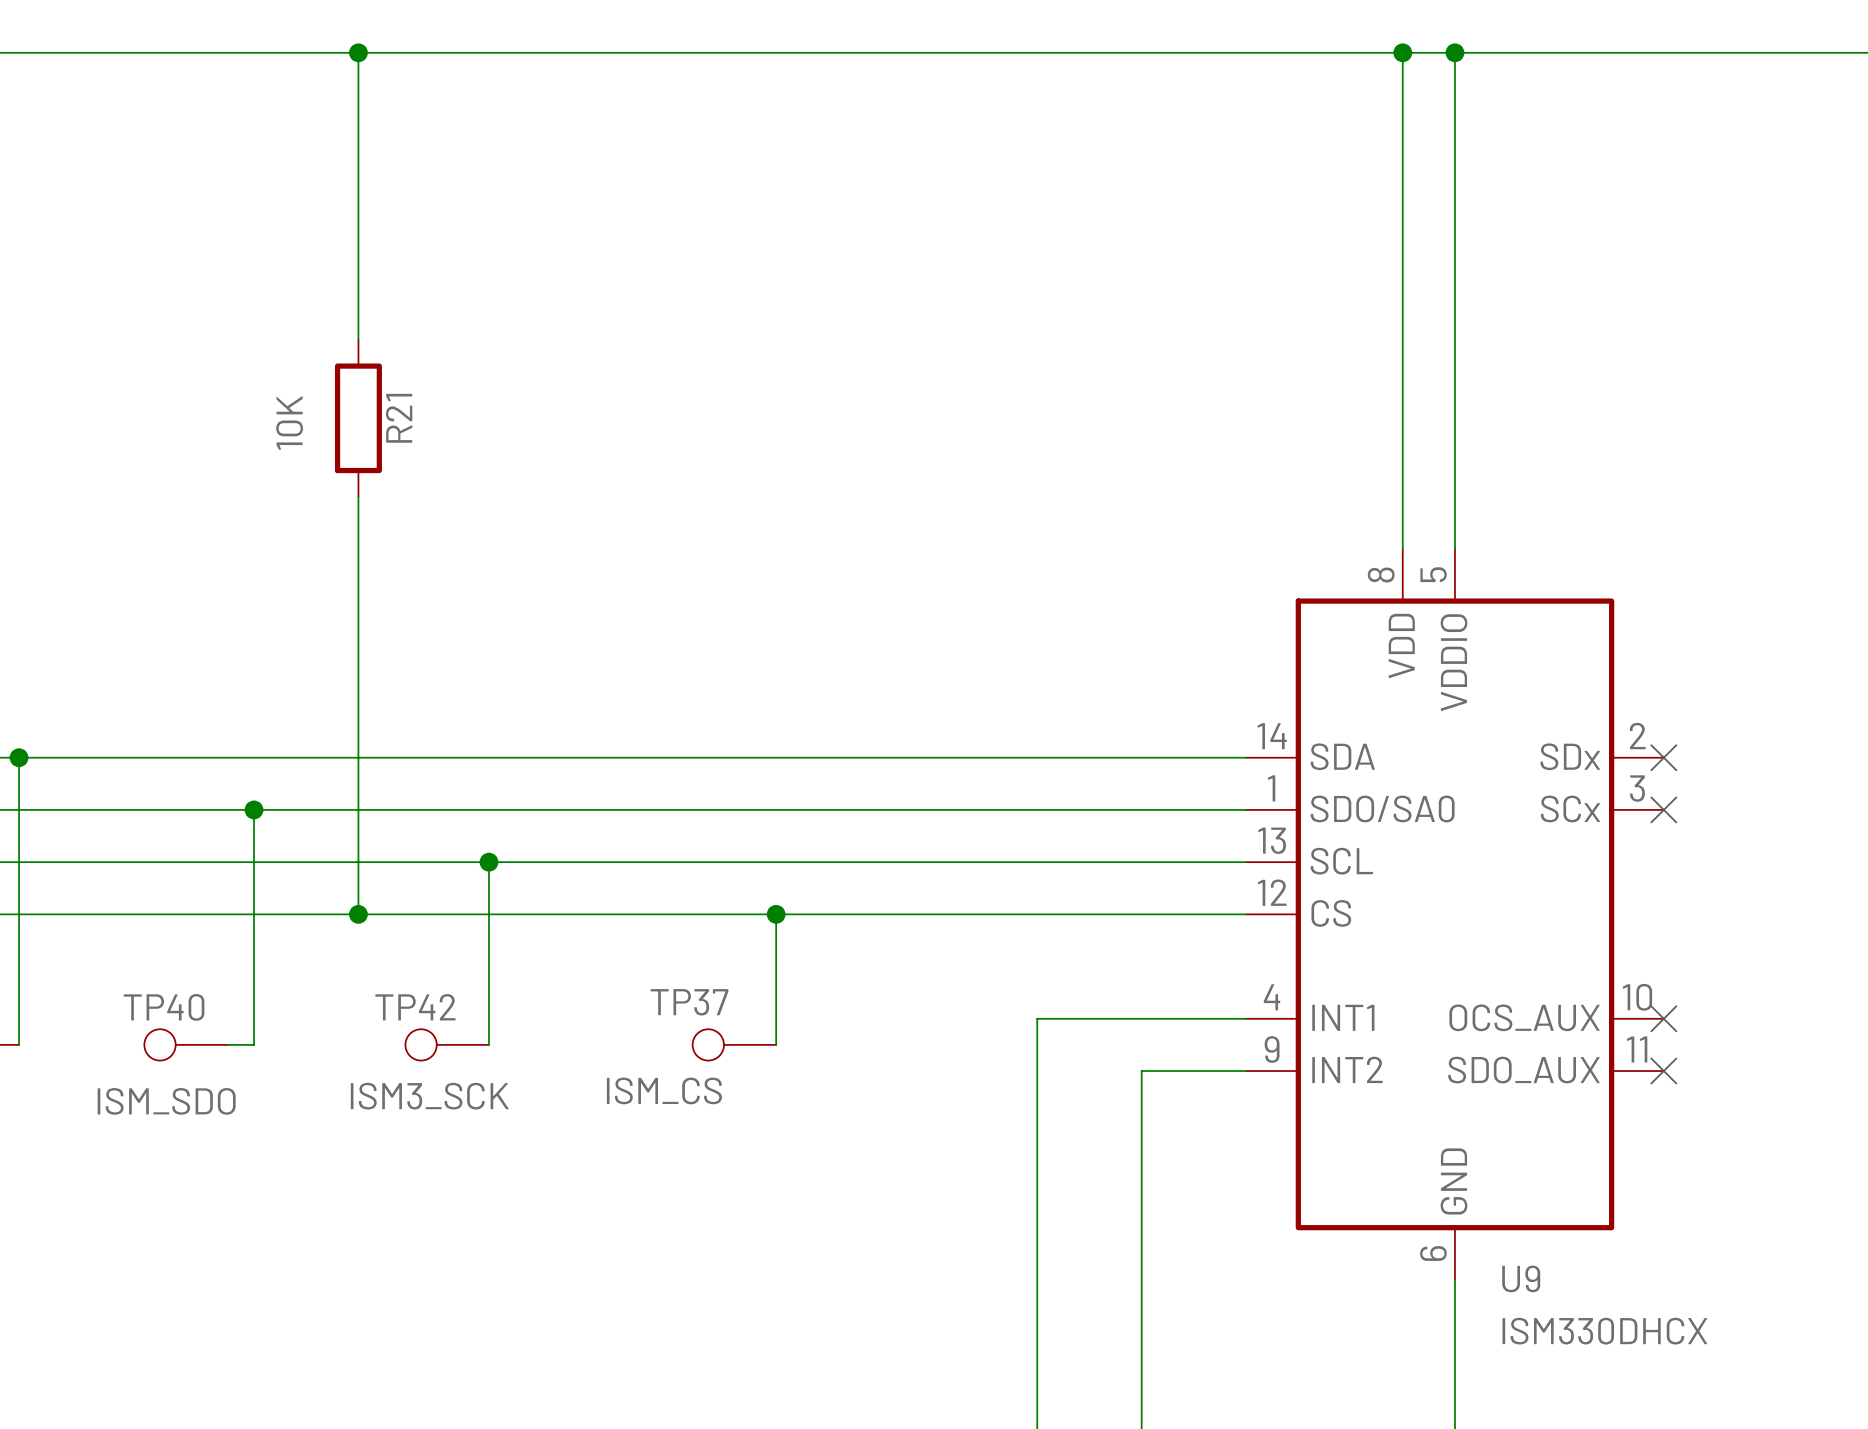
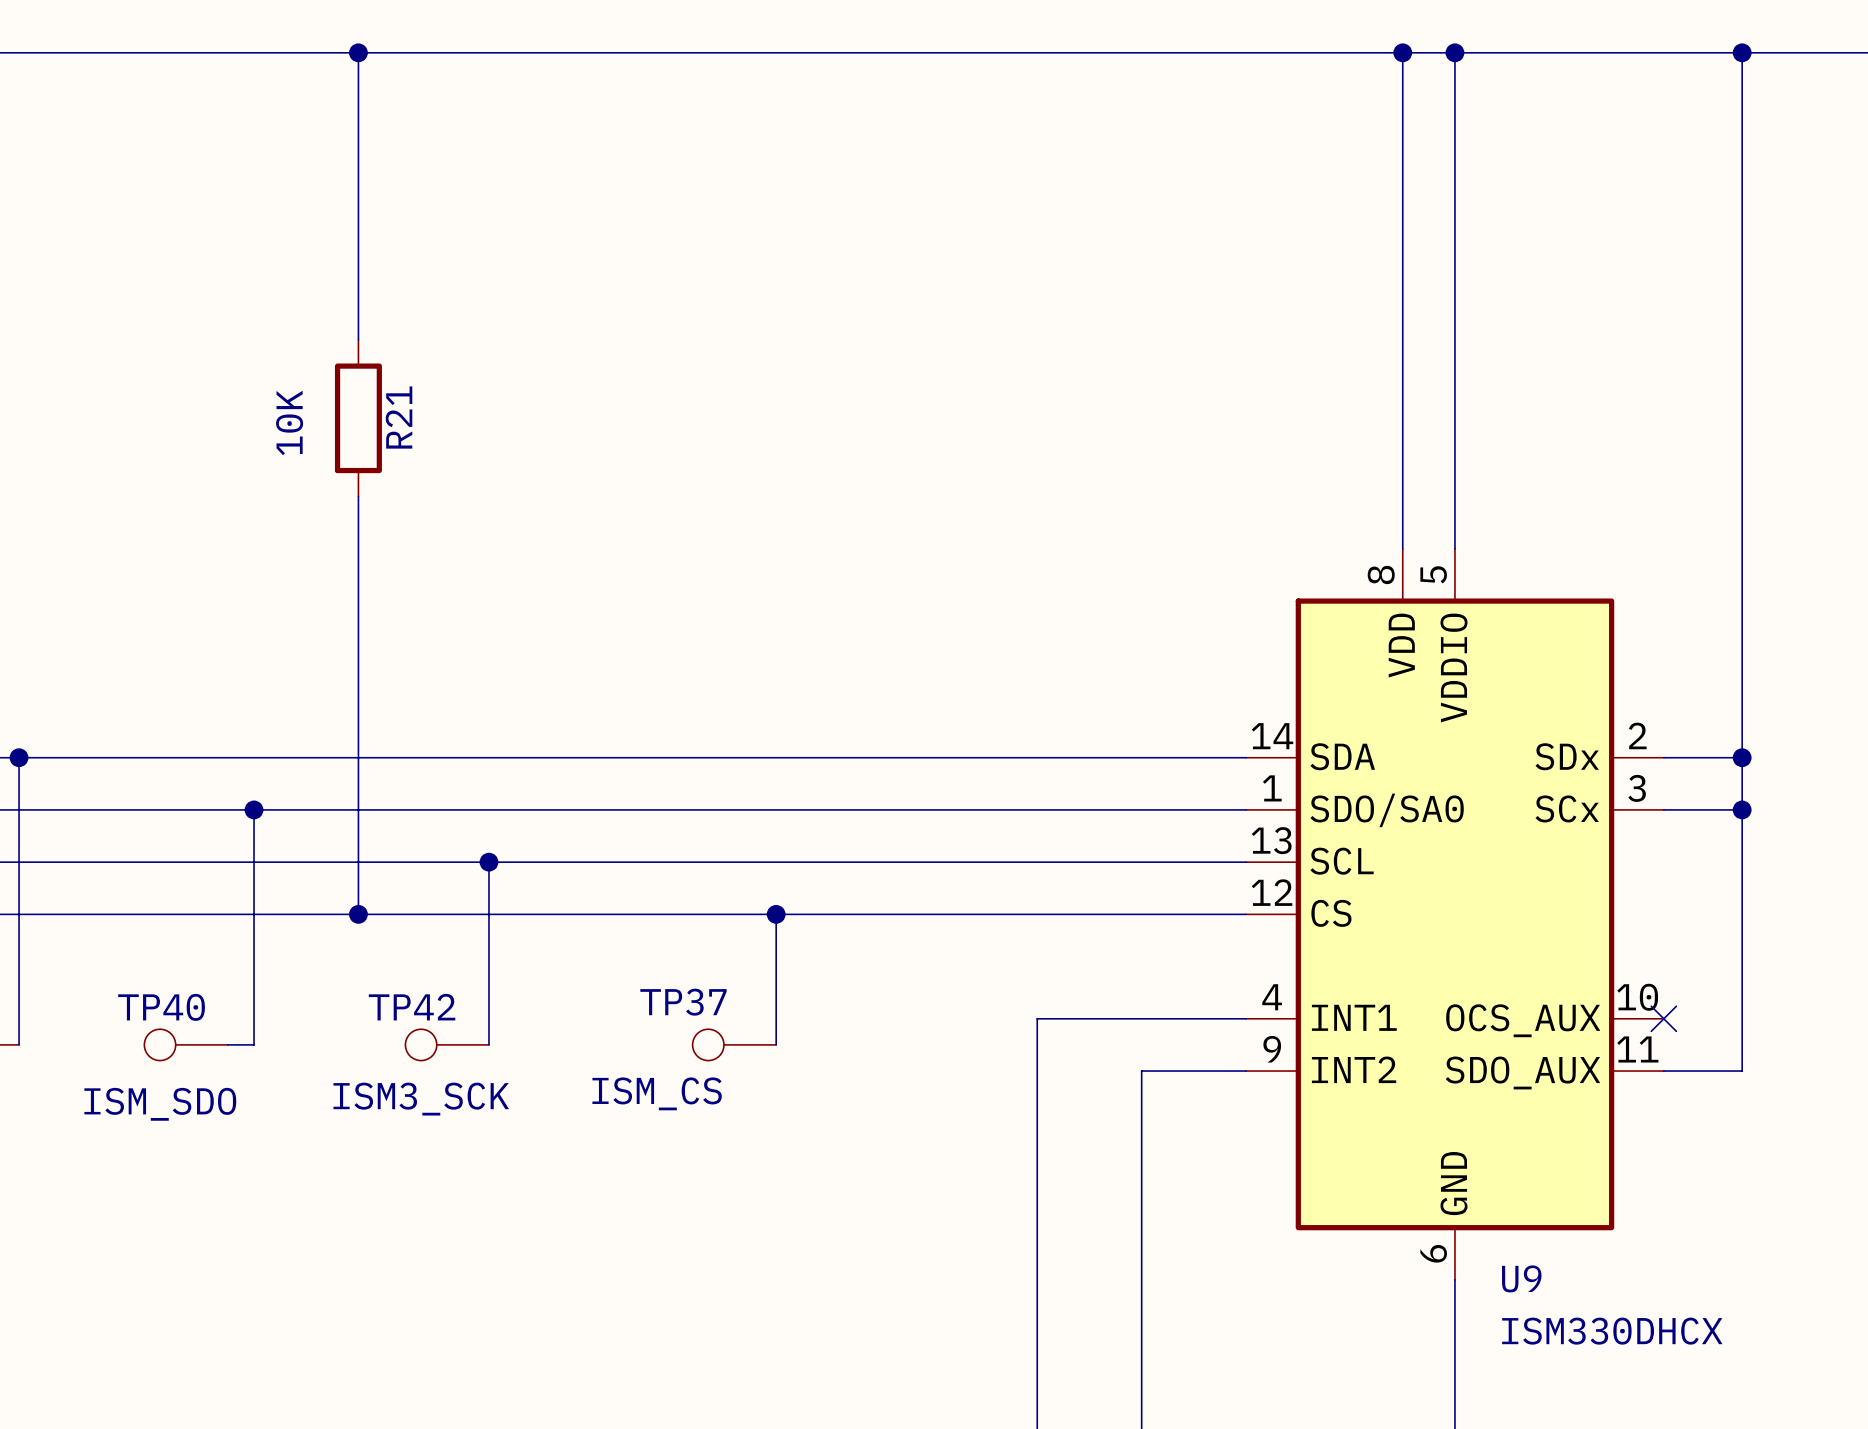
wire: none -> (1742, 52) (1742, 1071) (1663, 1071)
junction: none -> (1742, 52)
wire: none -> (1663, 757) (1742, 757)
no-connect mark: (1663, 757) -> none
junction: none -> (1742, 757)
wire: none -> (1663, 809) (1742, 809)
no-connect mark: (1663, 809) -> none
junction: none -> (1742, 809)
no-connect mark: (1663, 1071) -> none

